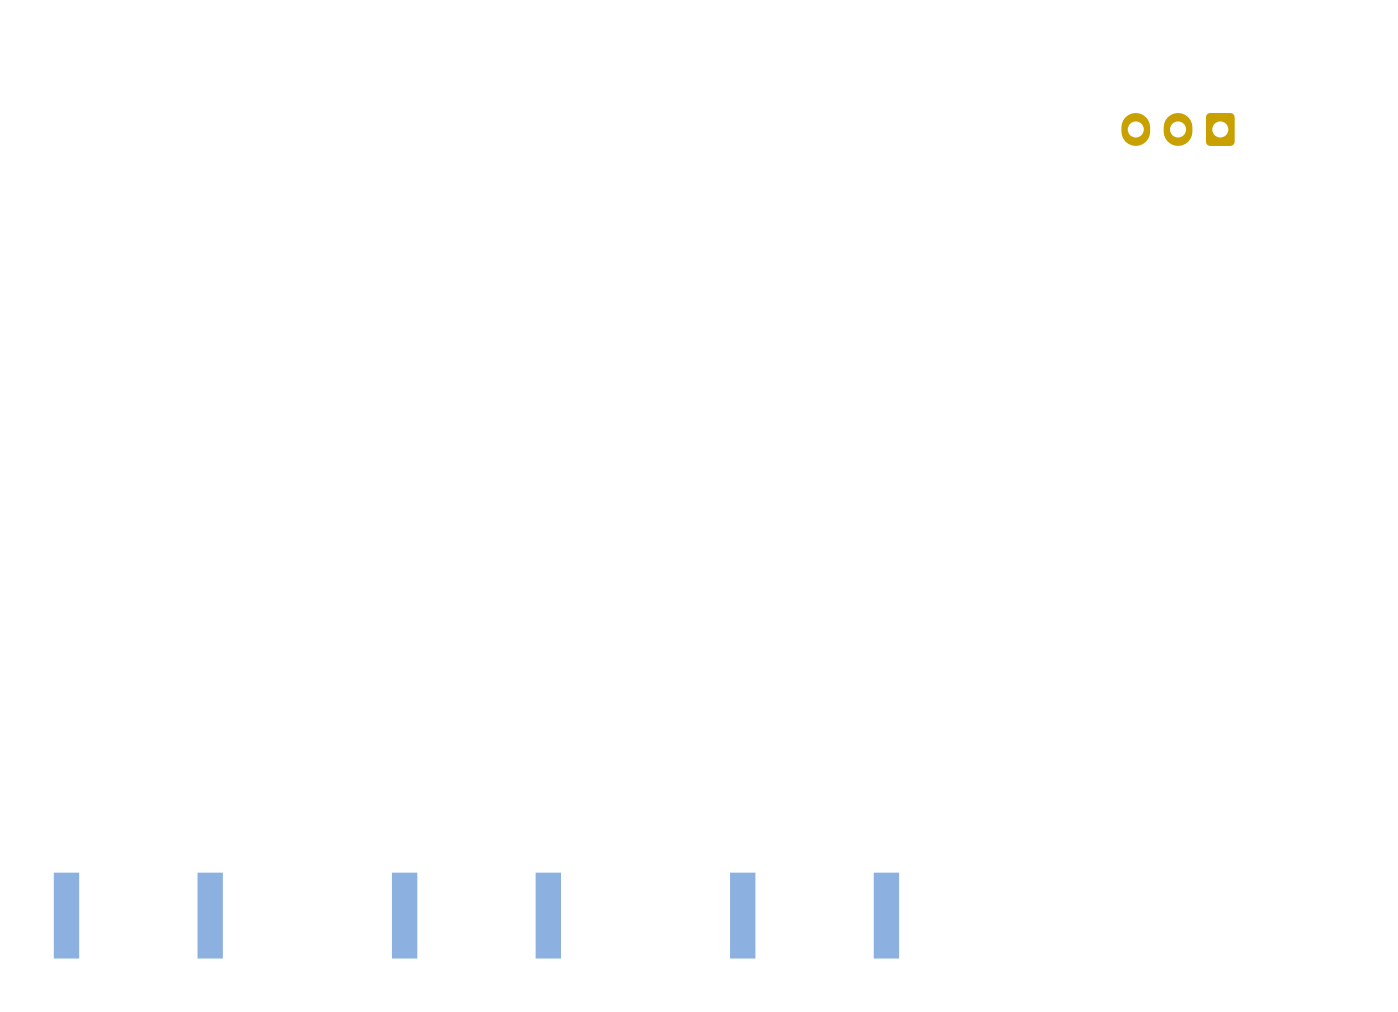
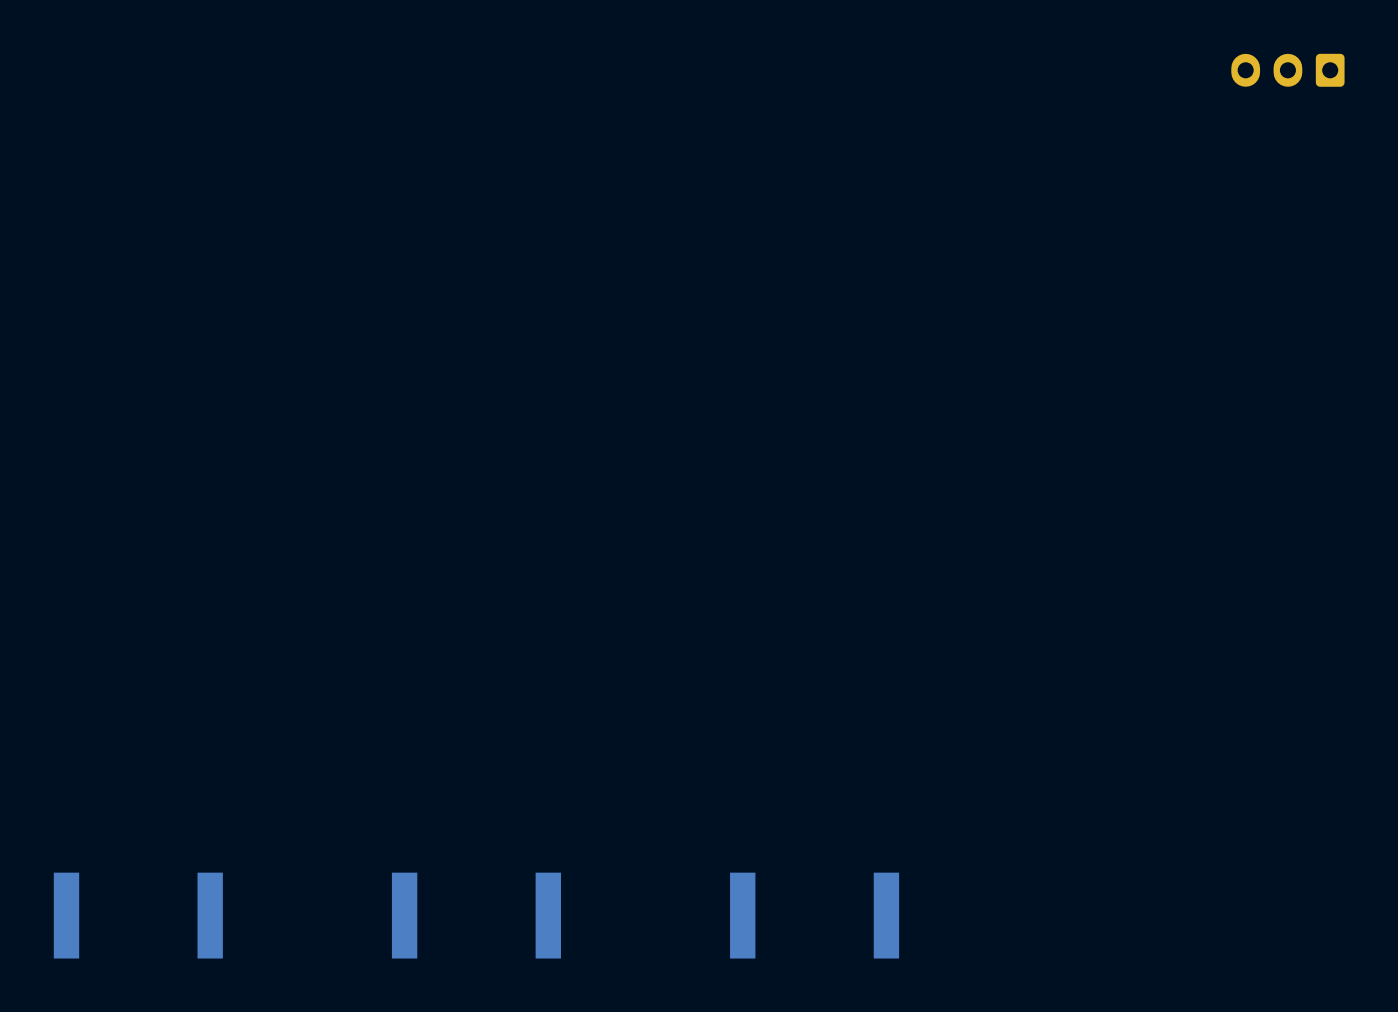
part position: (1178, 129) -> (1287, 70)

